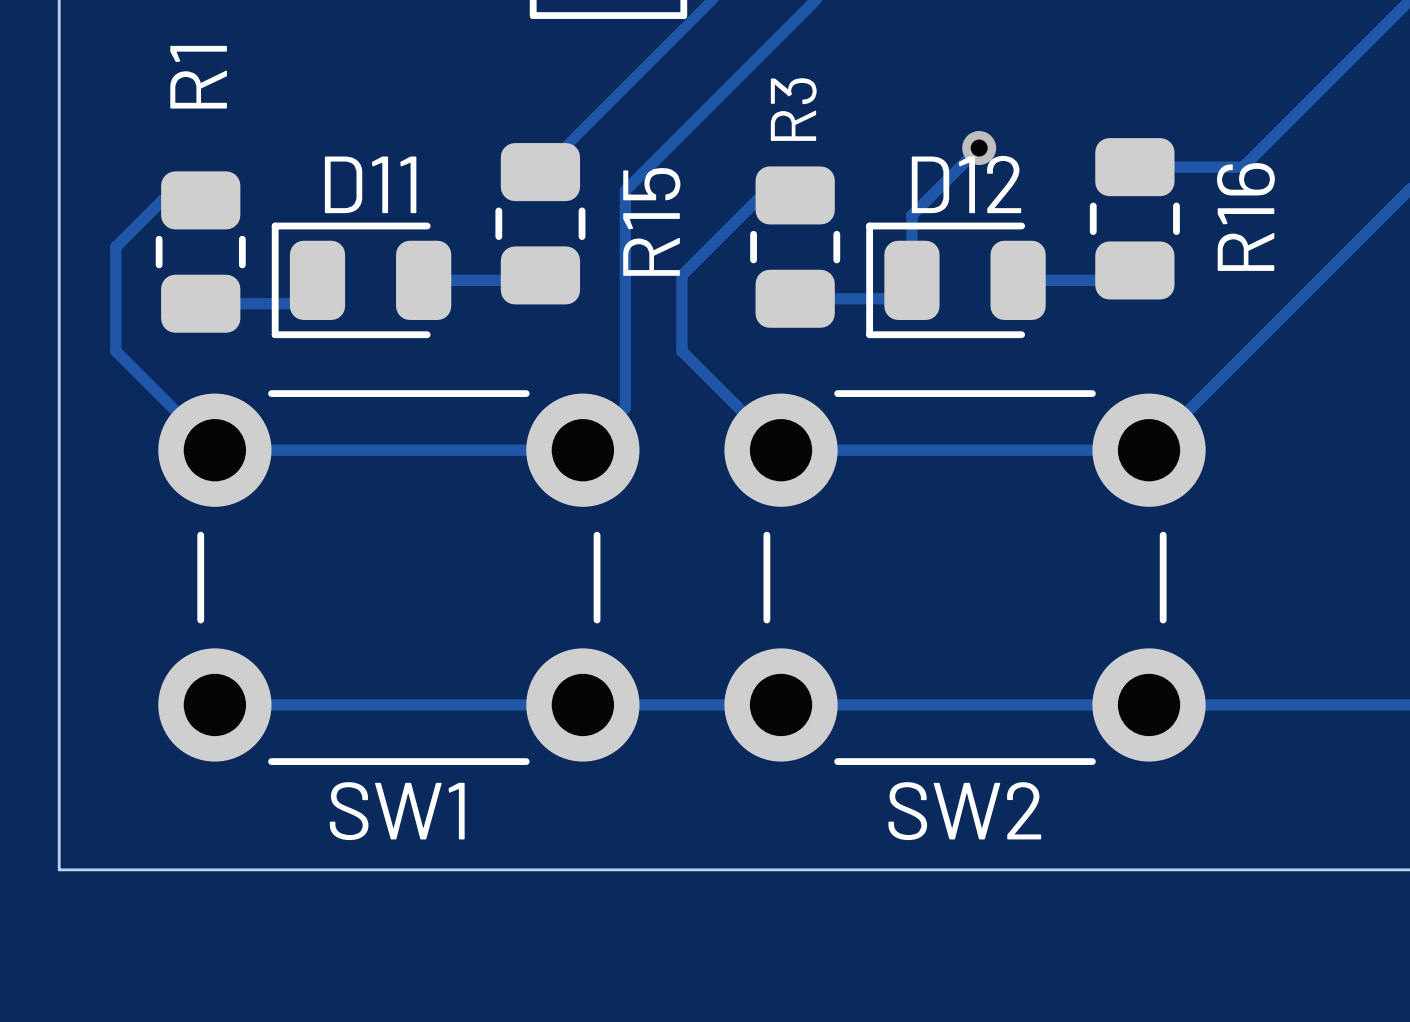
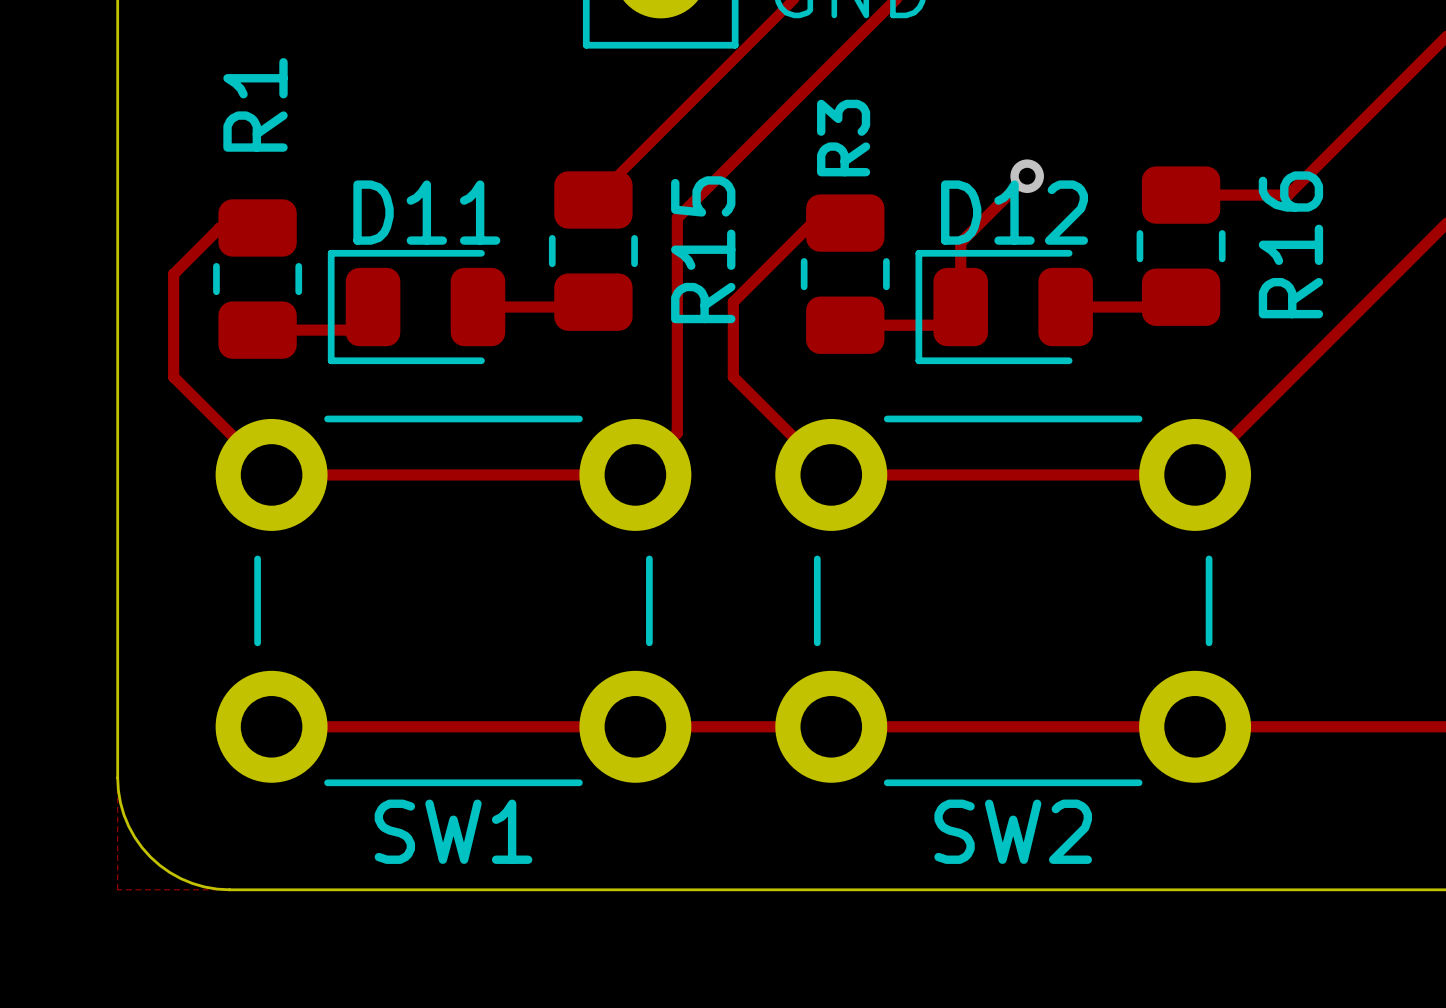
board edge: (59, 756) (59, 869) (172, 869) -> (117, 777) (123, 814) (134, 837) (150, 857) (181, 878) (204, 887) (229, 889)

